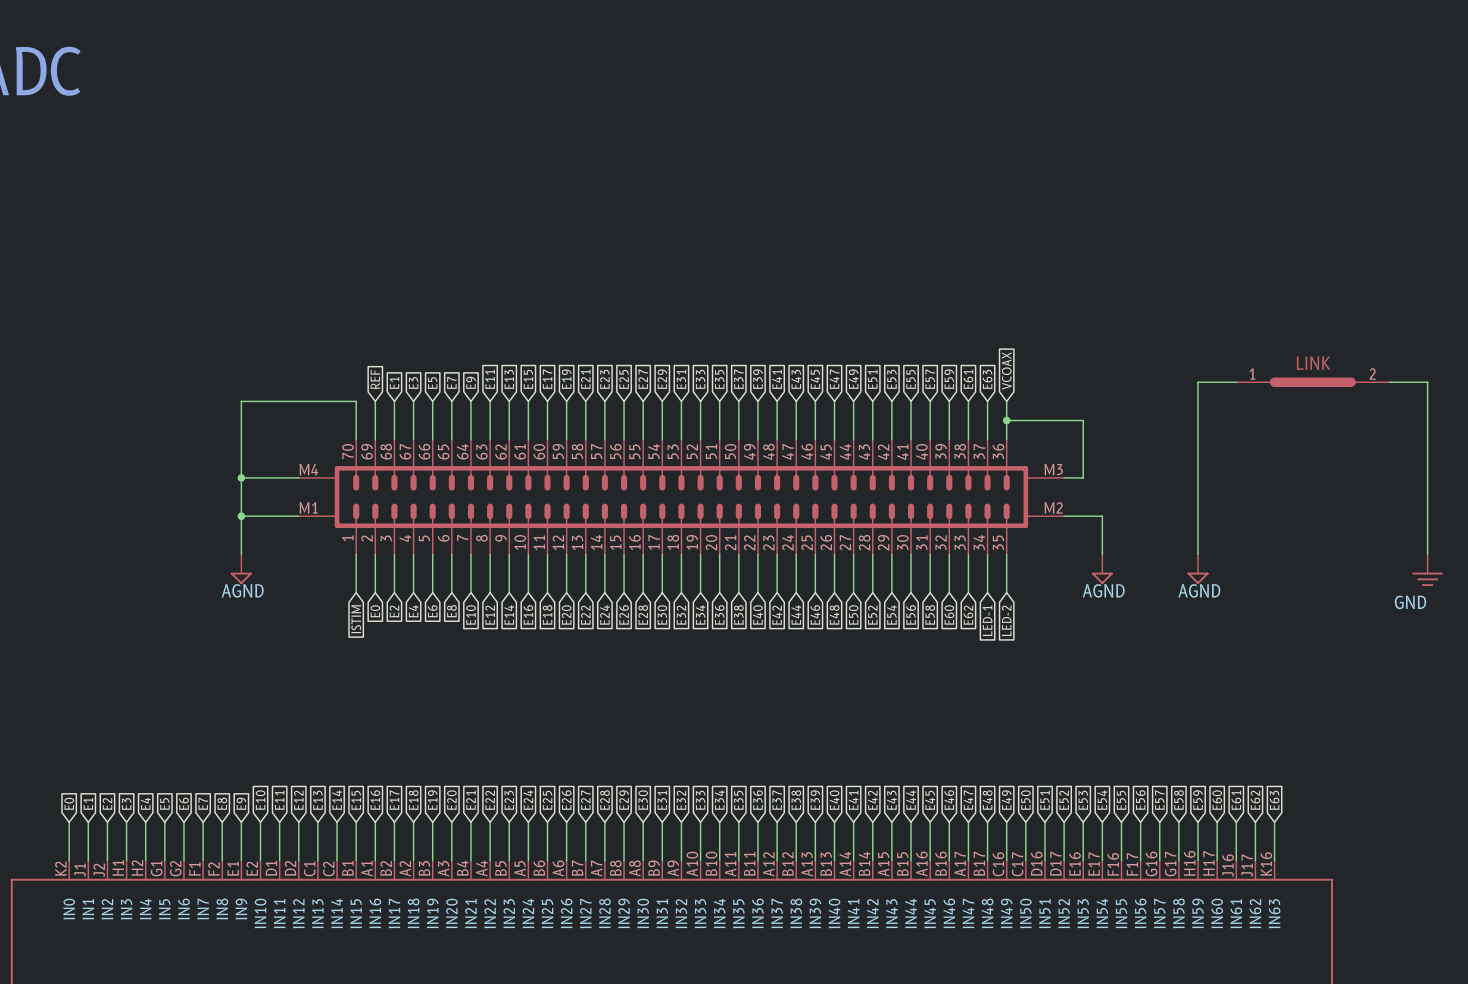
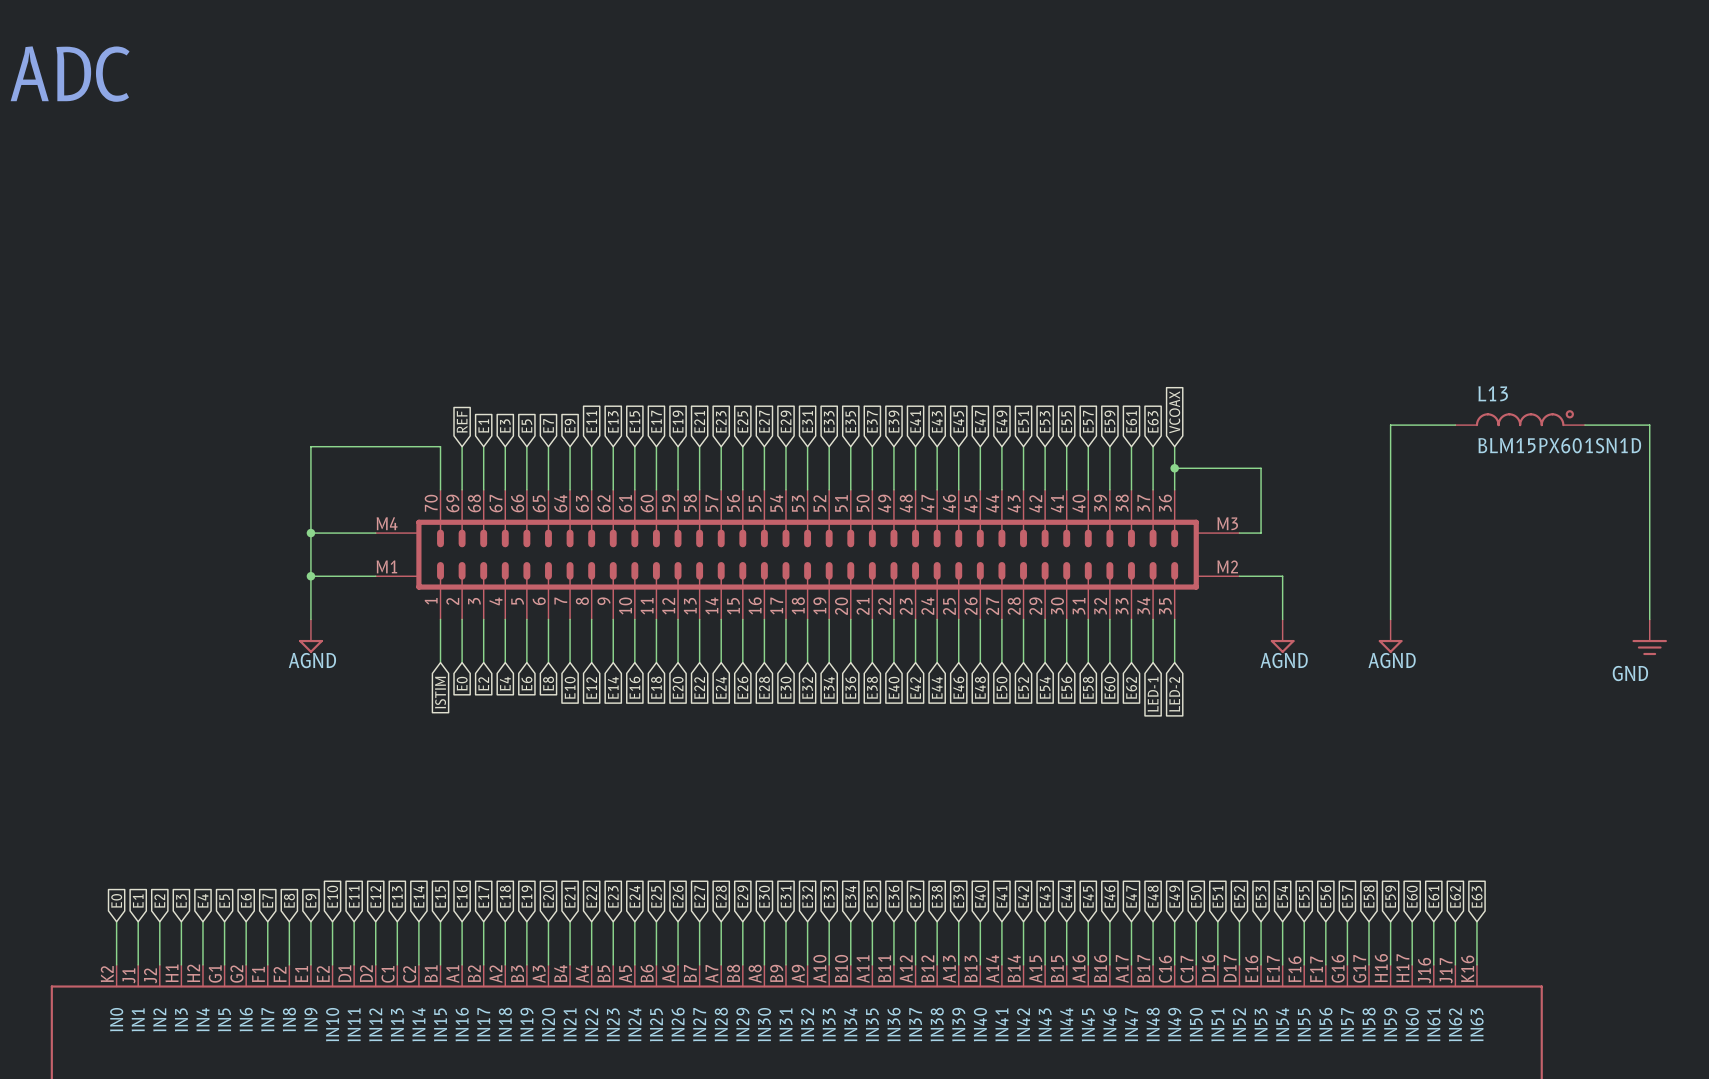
L13: none -> BLM15PX601SN1D (1520, 418)
part: (1312, 382) -> none

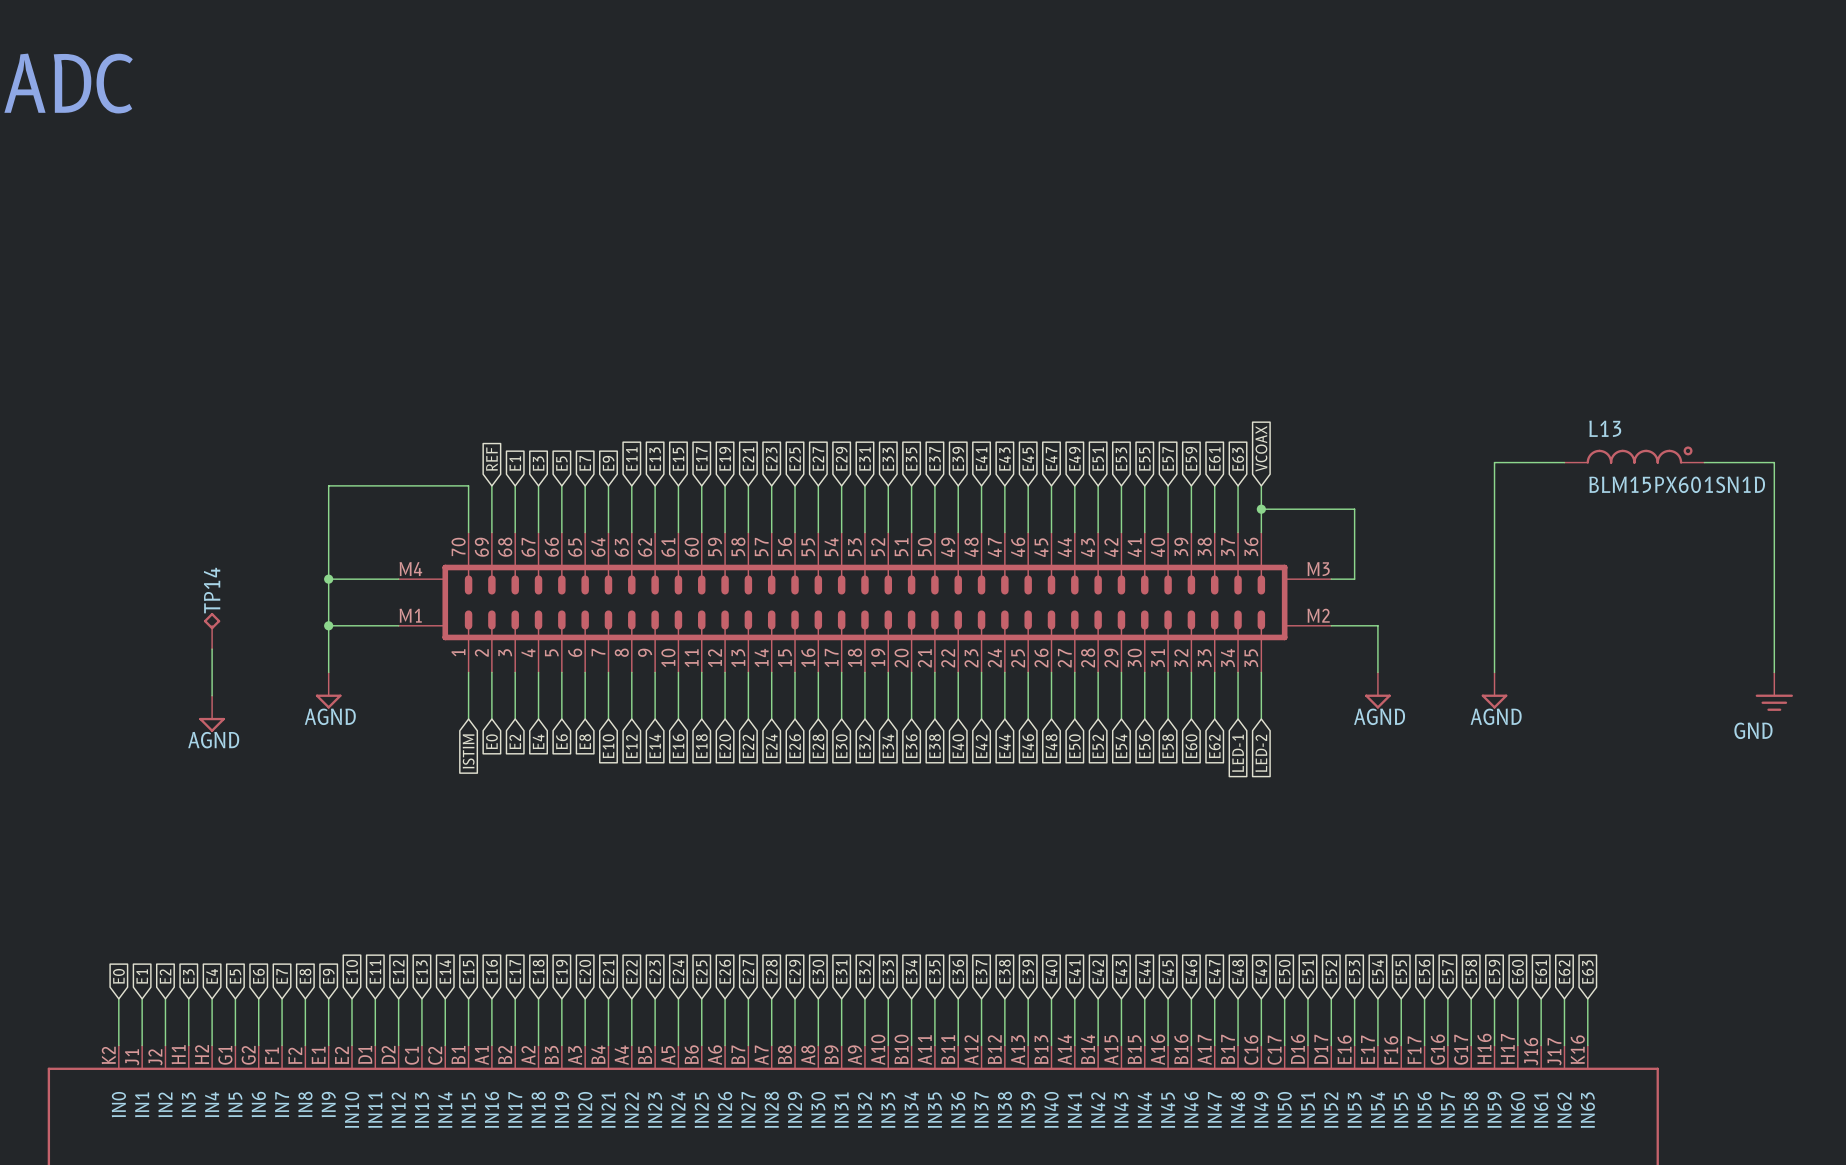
TP14: none -> (212, 631)
wire: none -> (212, 649) (212, 695)
power symbol: none -> AGND (212, 713)

